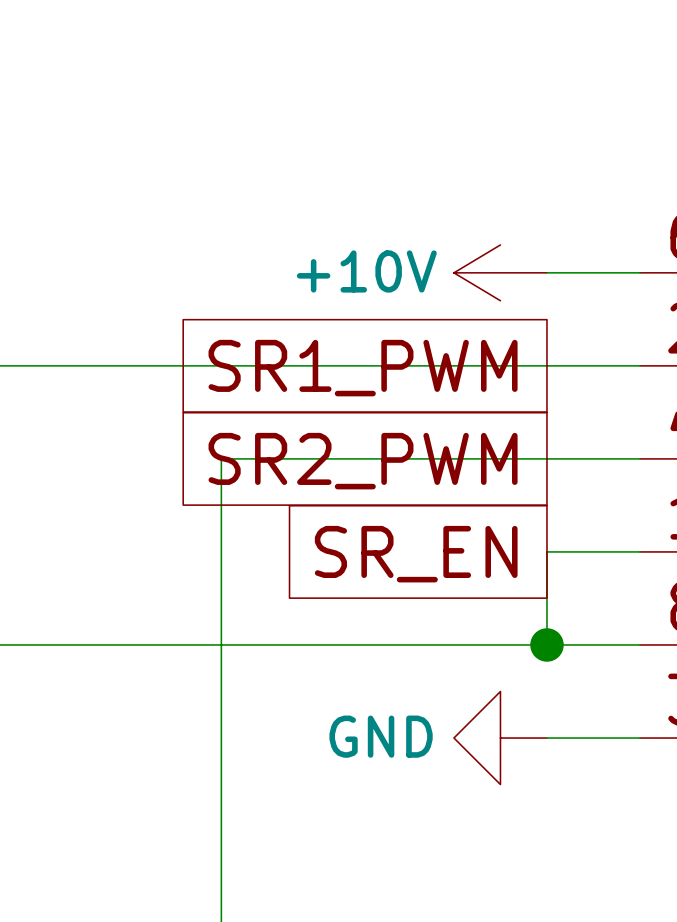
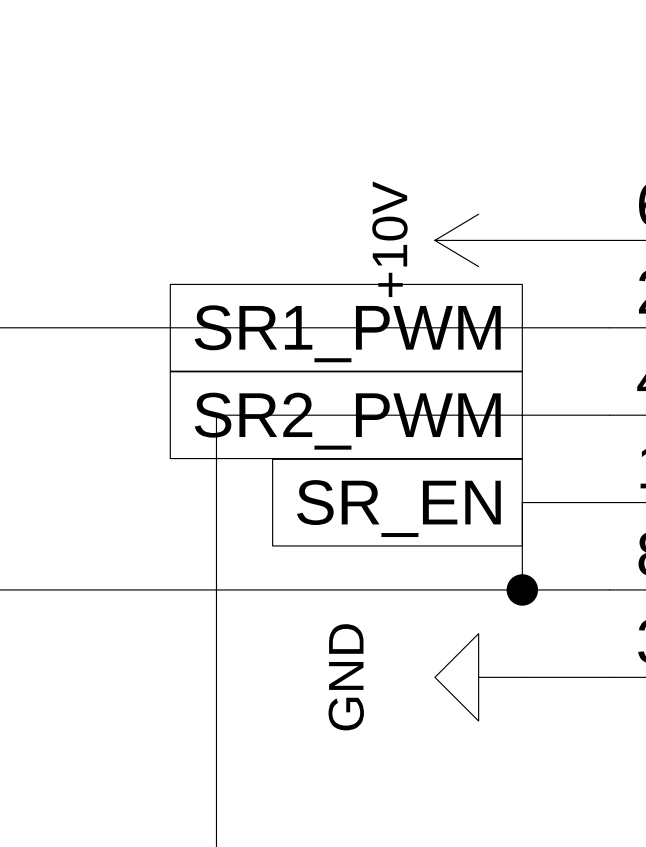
power symbol text rotation: 0° (366, 271) -> 90° counterclockwise (389, 239)
power symbol text rotation: 0° (381, 736) -> 90° counterclockwise (346, 677)

